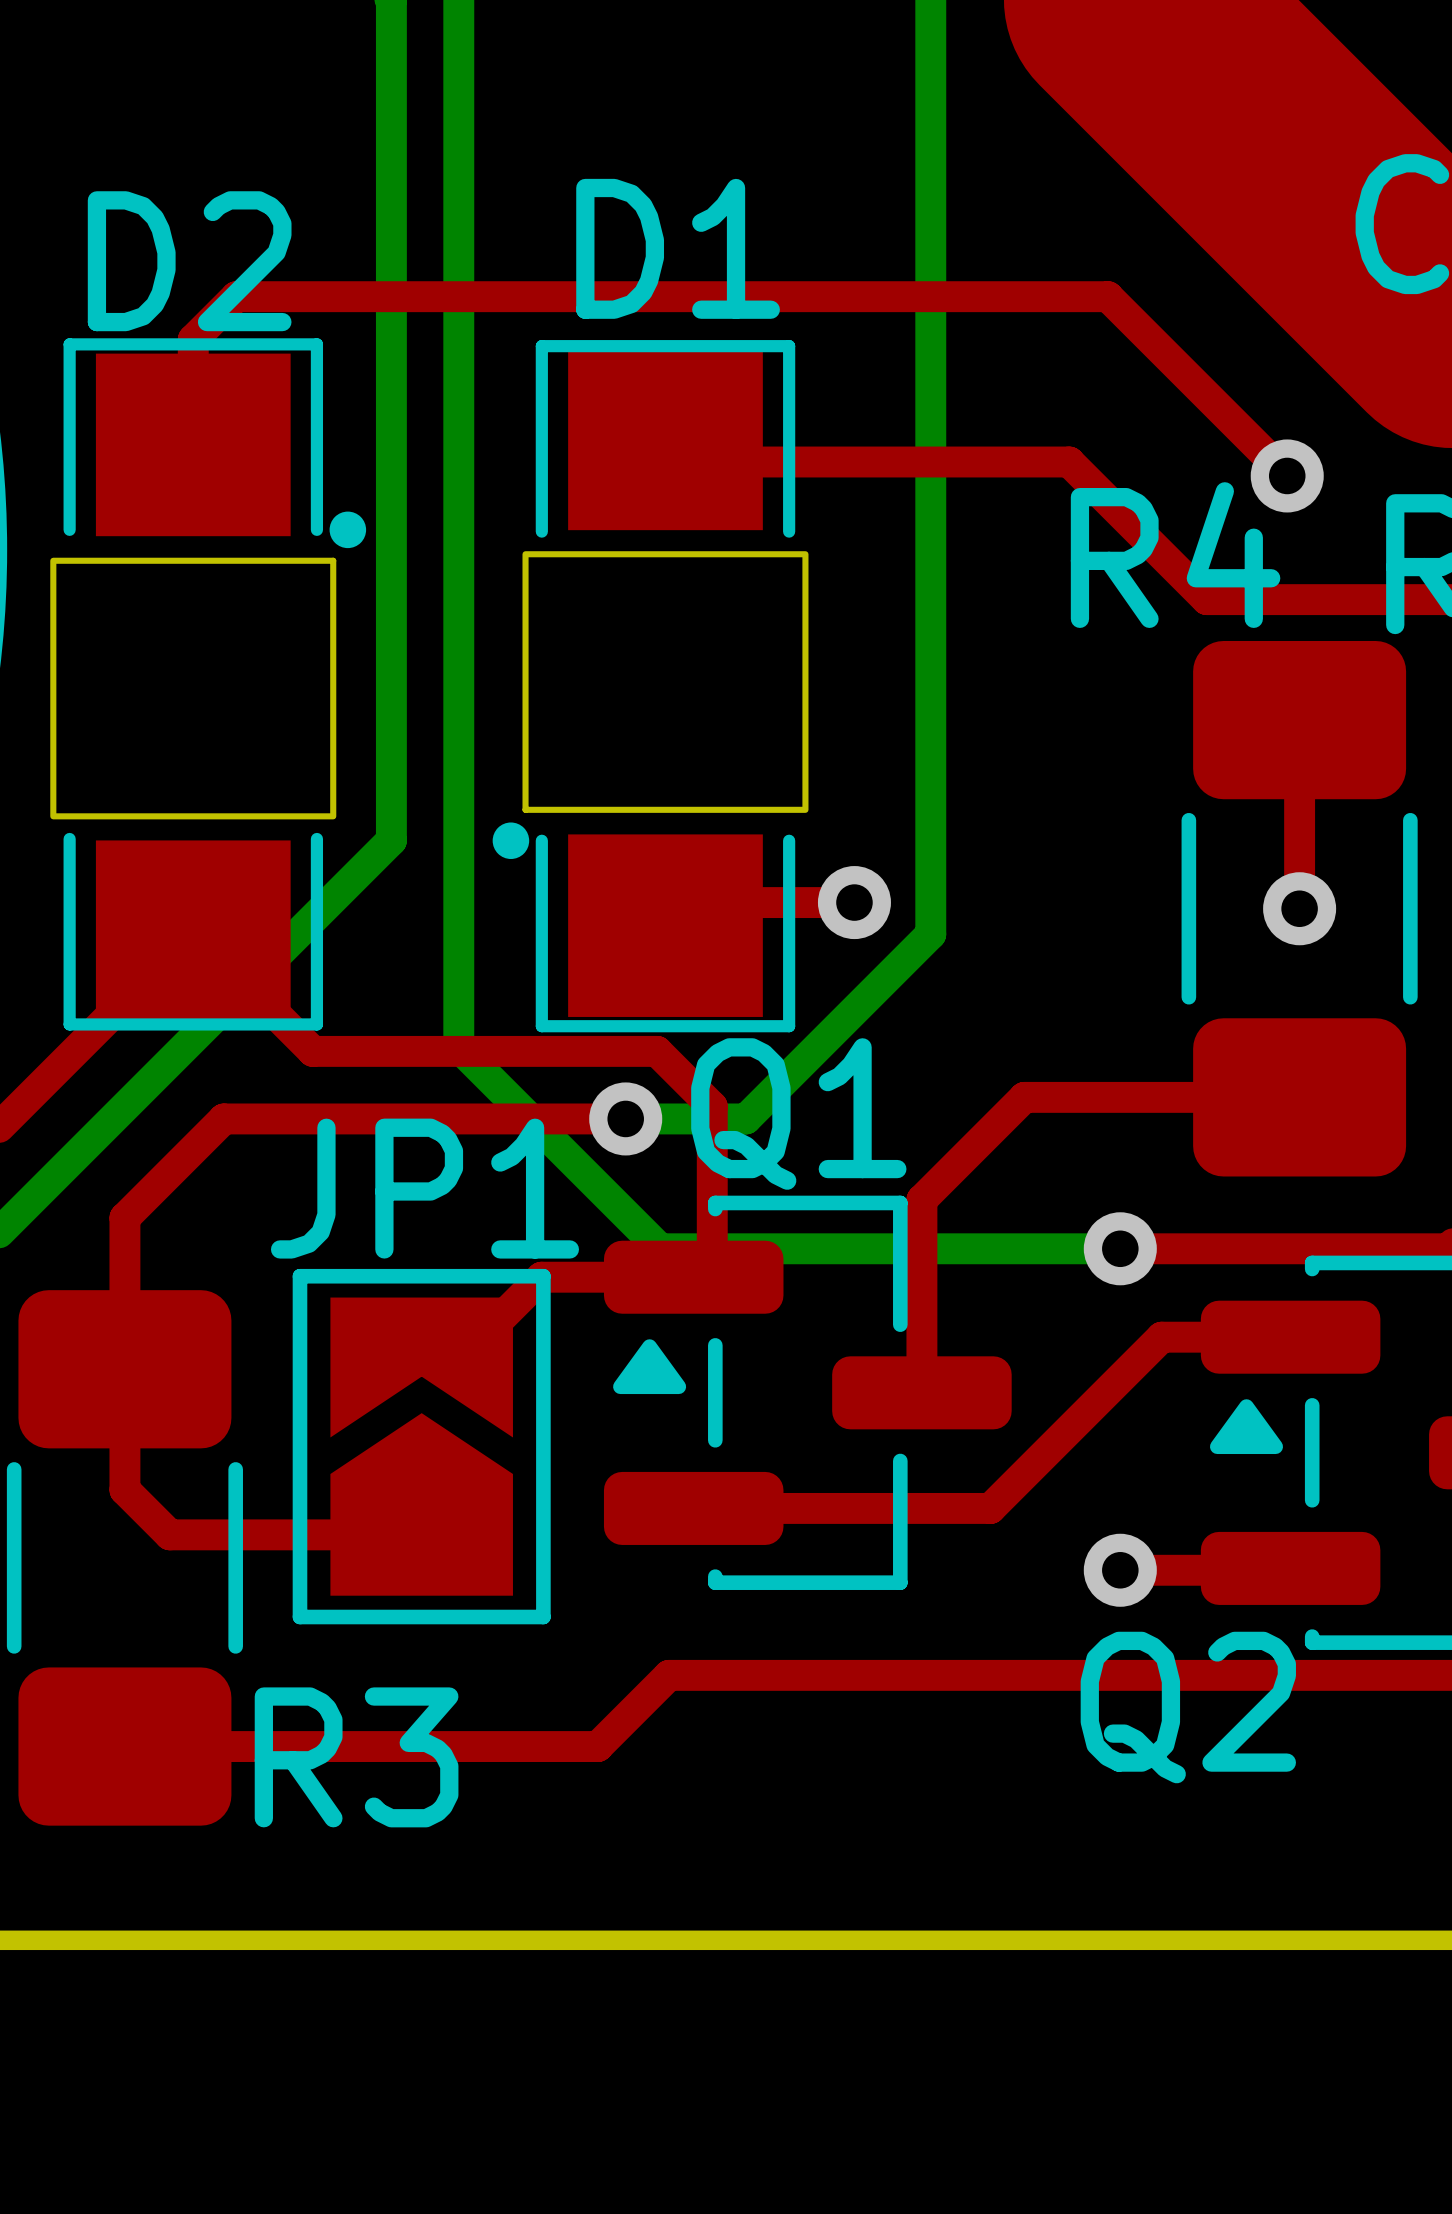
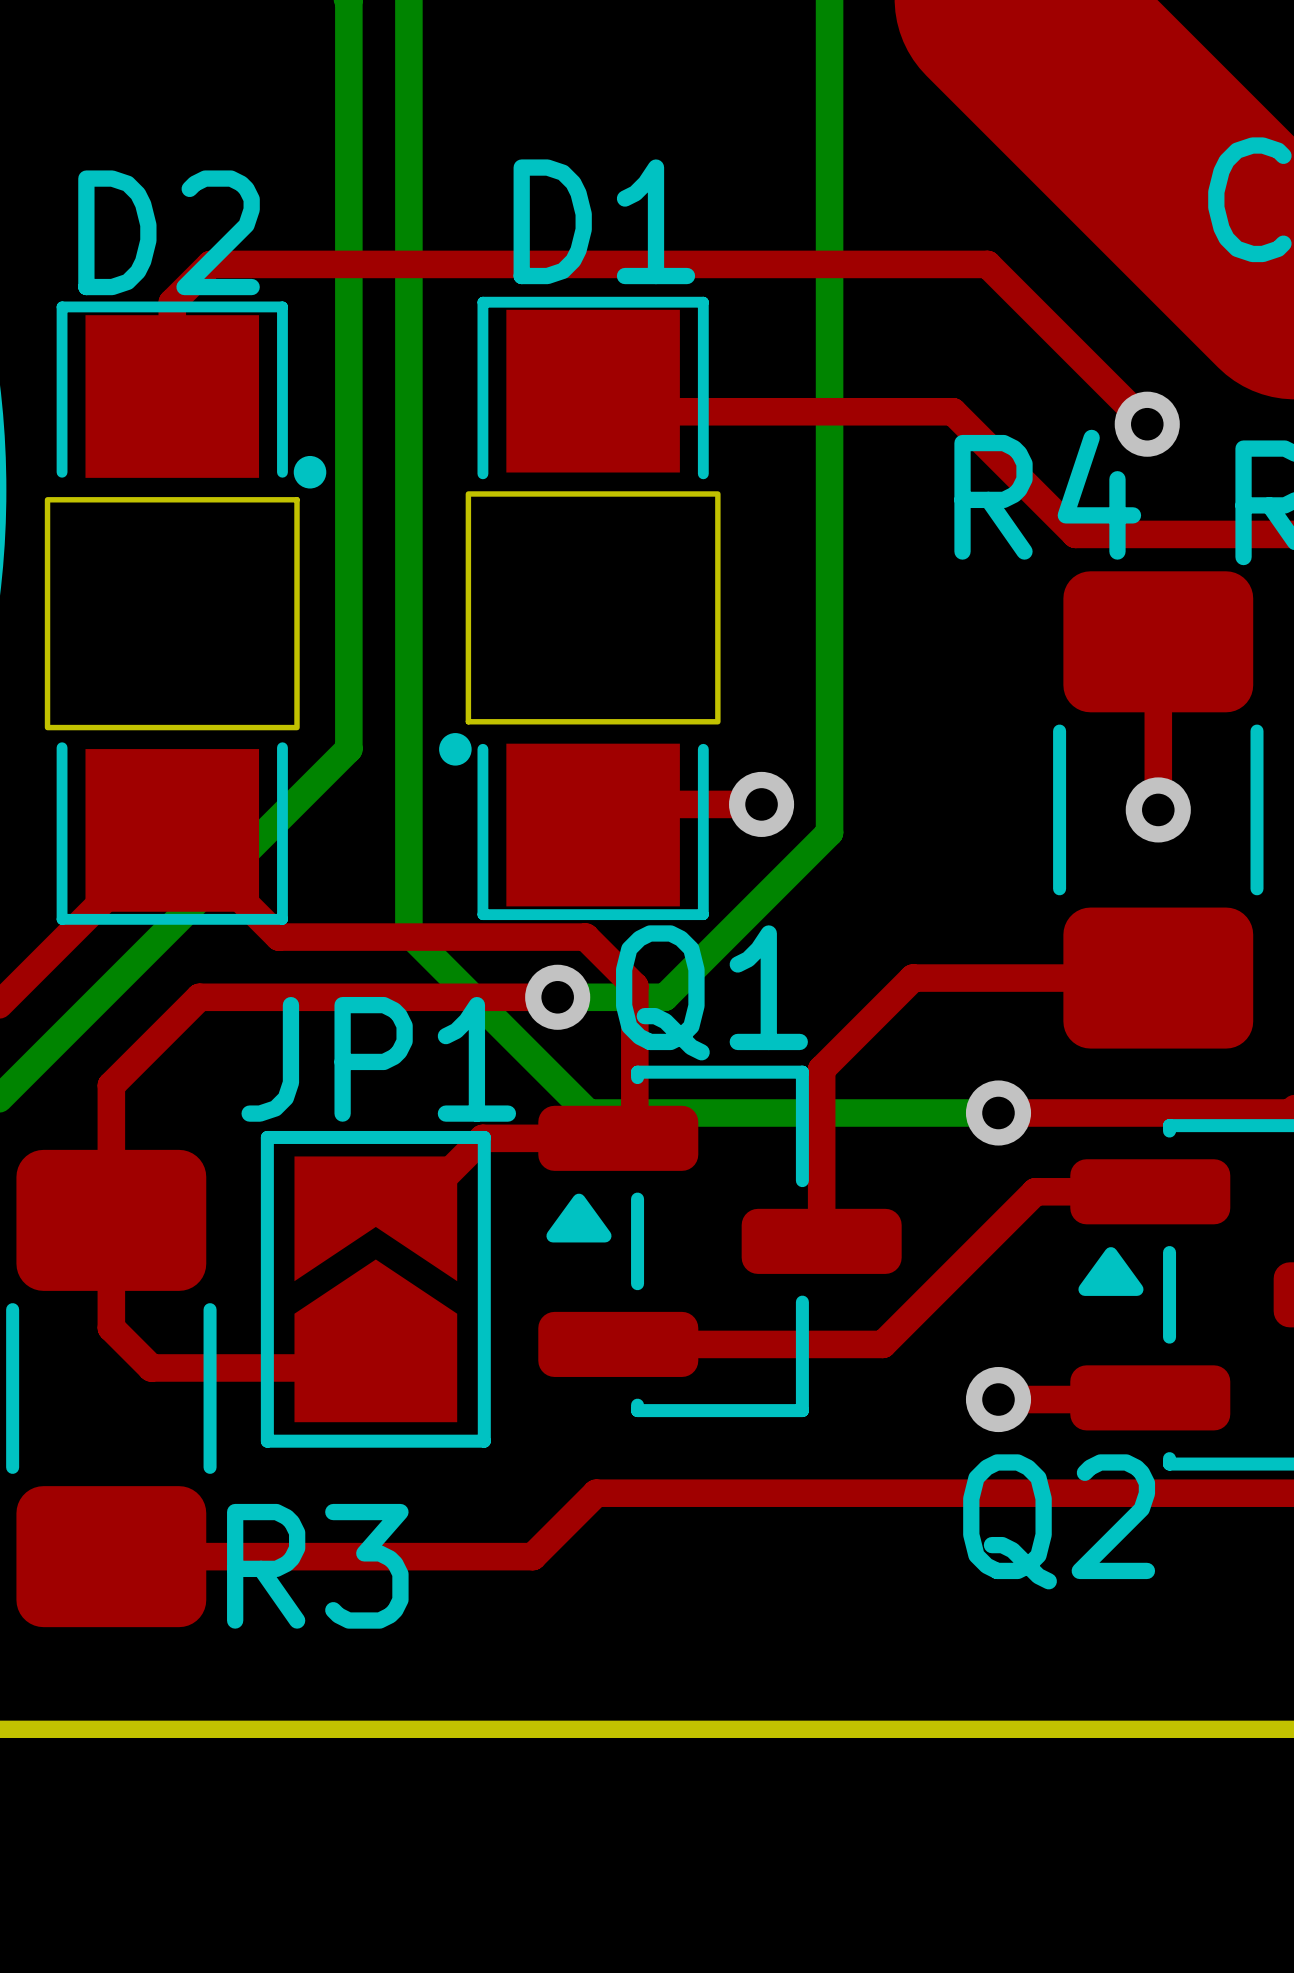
D1 footprint: [50, 338, 367, 1031] -> [44, 301, 327, 925]
D2 footprint: [492, 340, 809, 1033] -> [439, 296, 721, 921]

